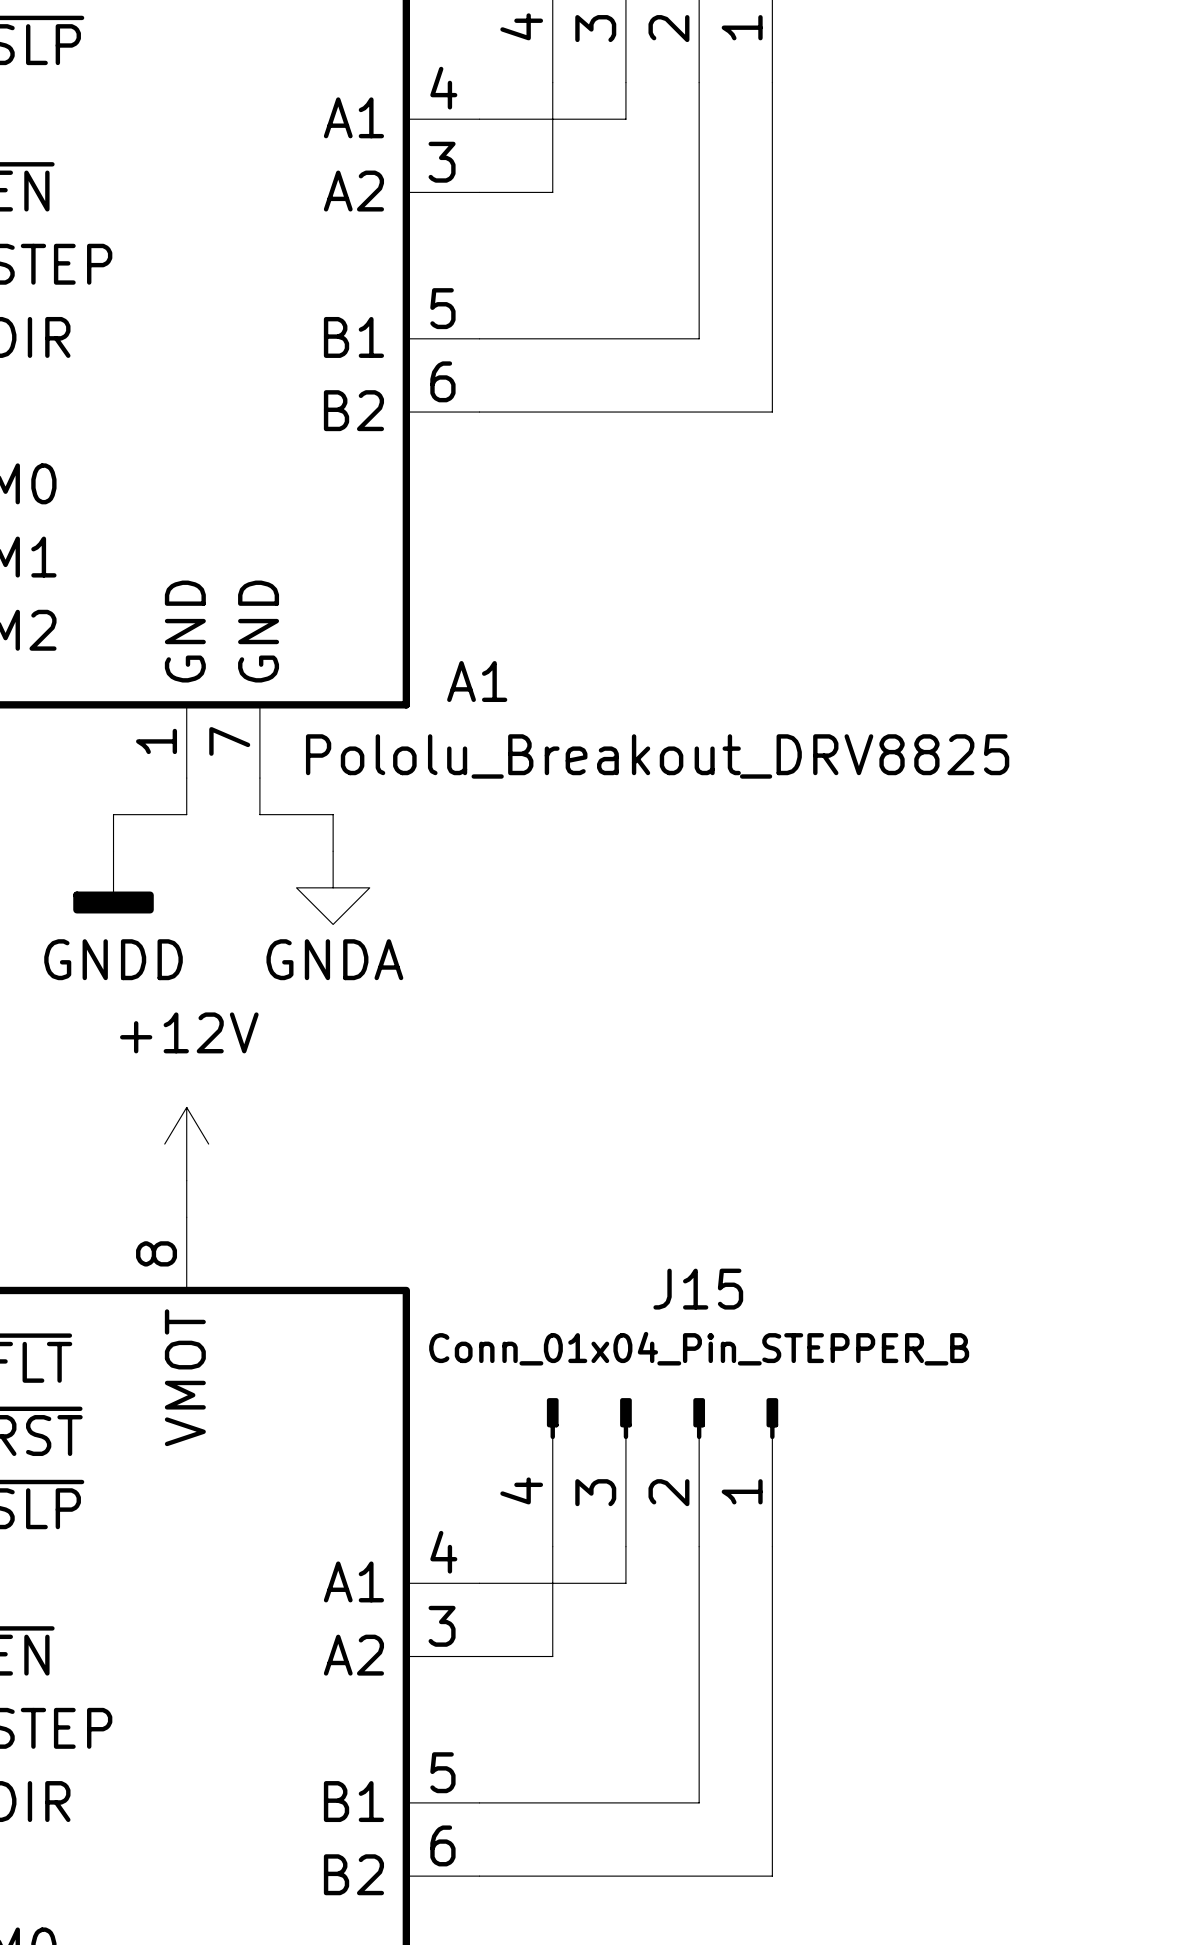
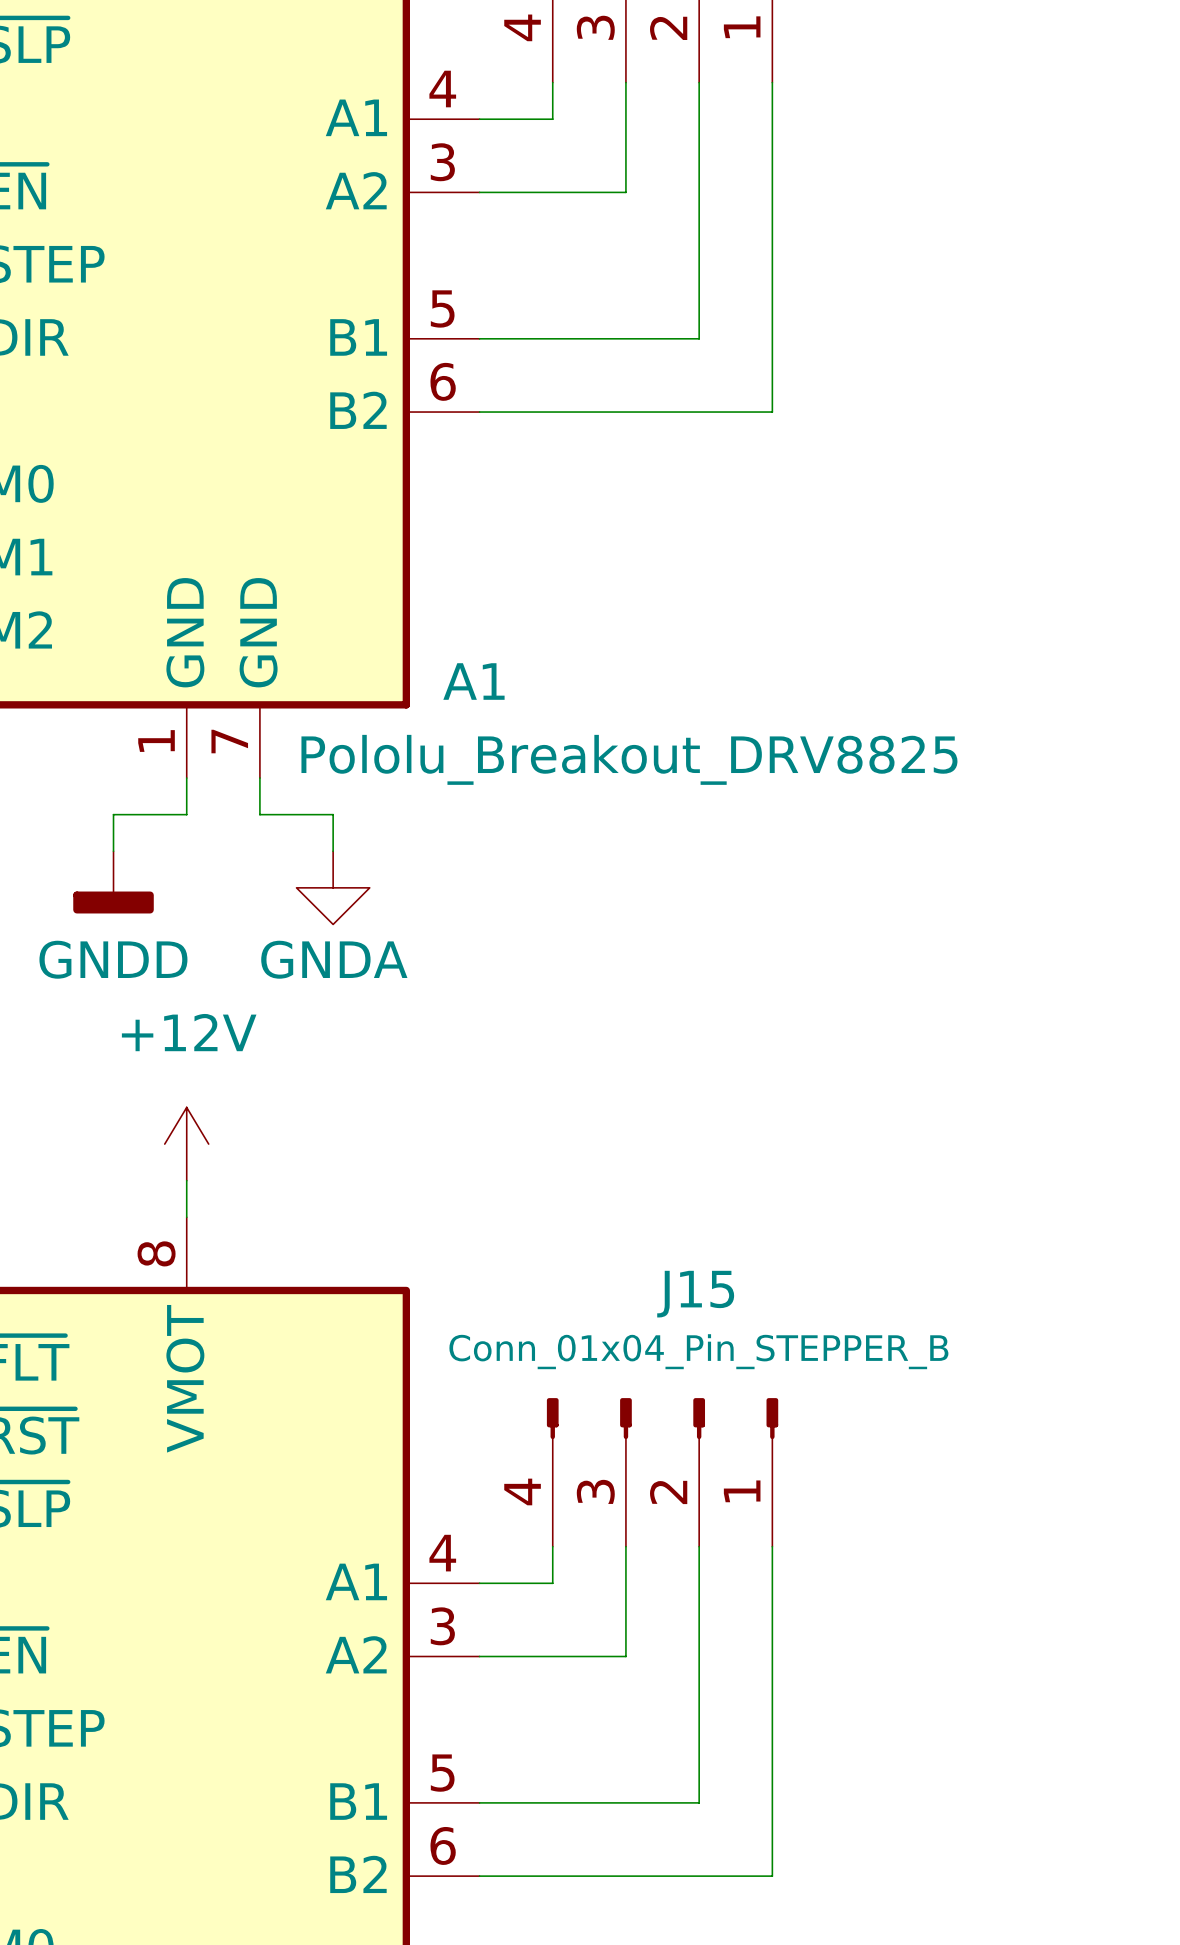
wire: (625, 119) (552, 119) (552, 192) -> (625, 119) (625, 192) (552, 192)
wire: (625, 1583) (552, 1583) (552, 1656) -> (625, 1583) (625, 1656) (552, 1656)

